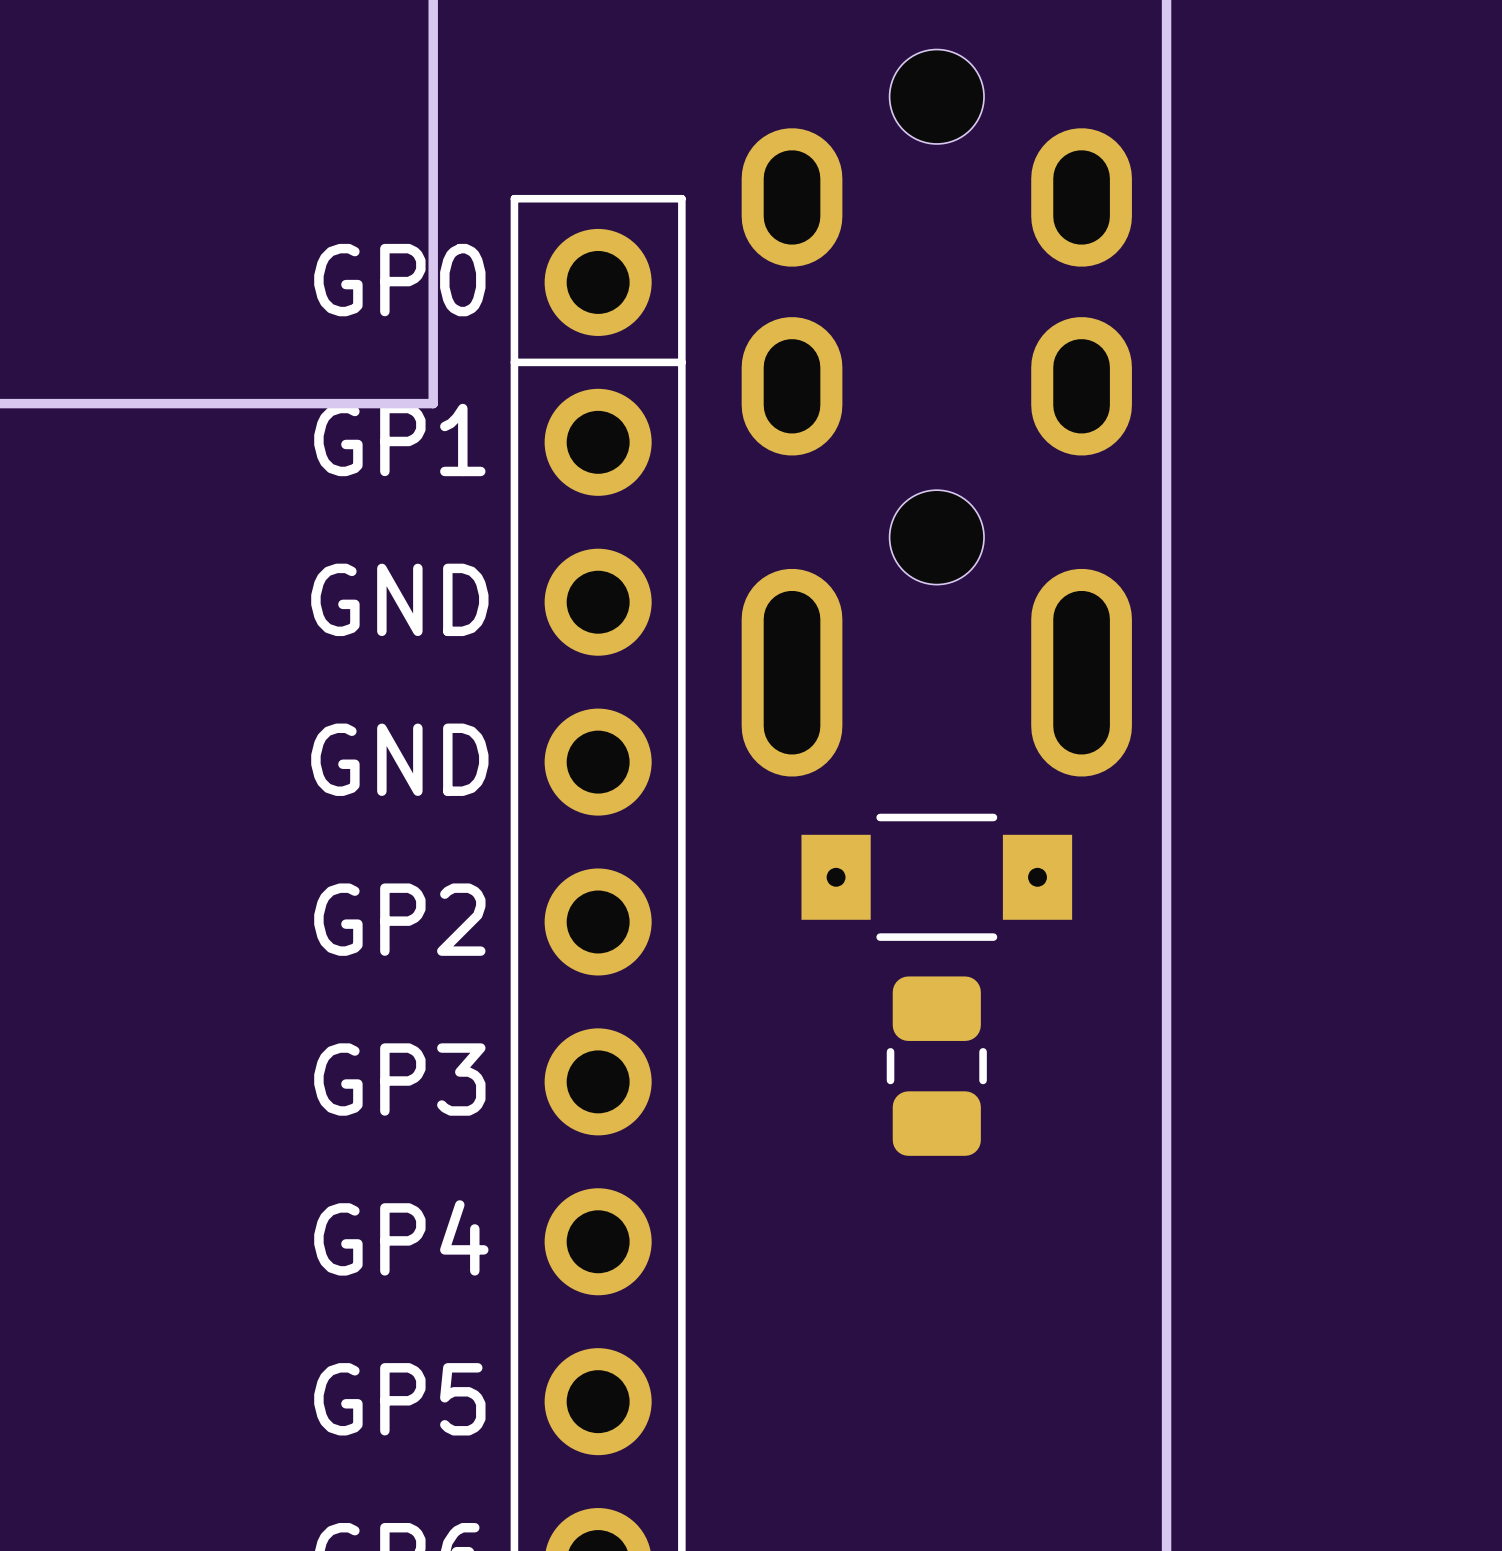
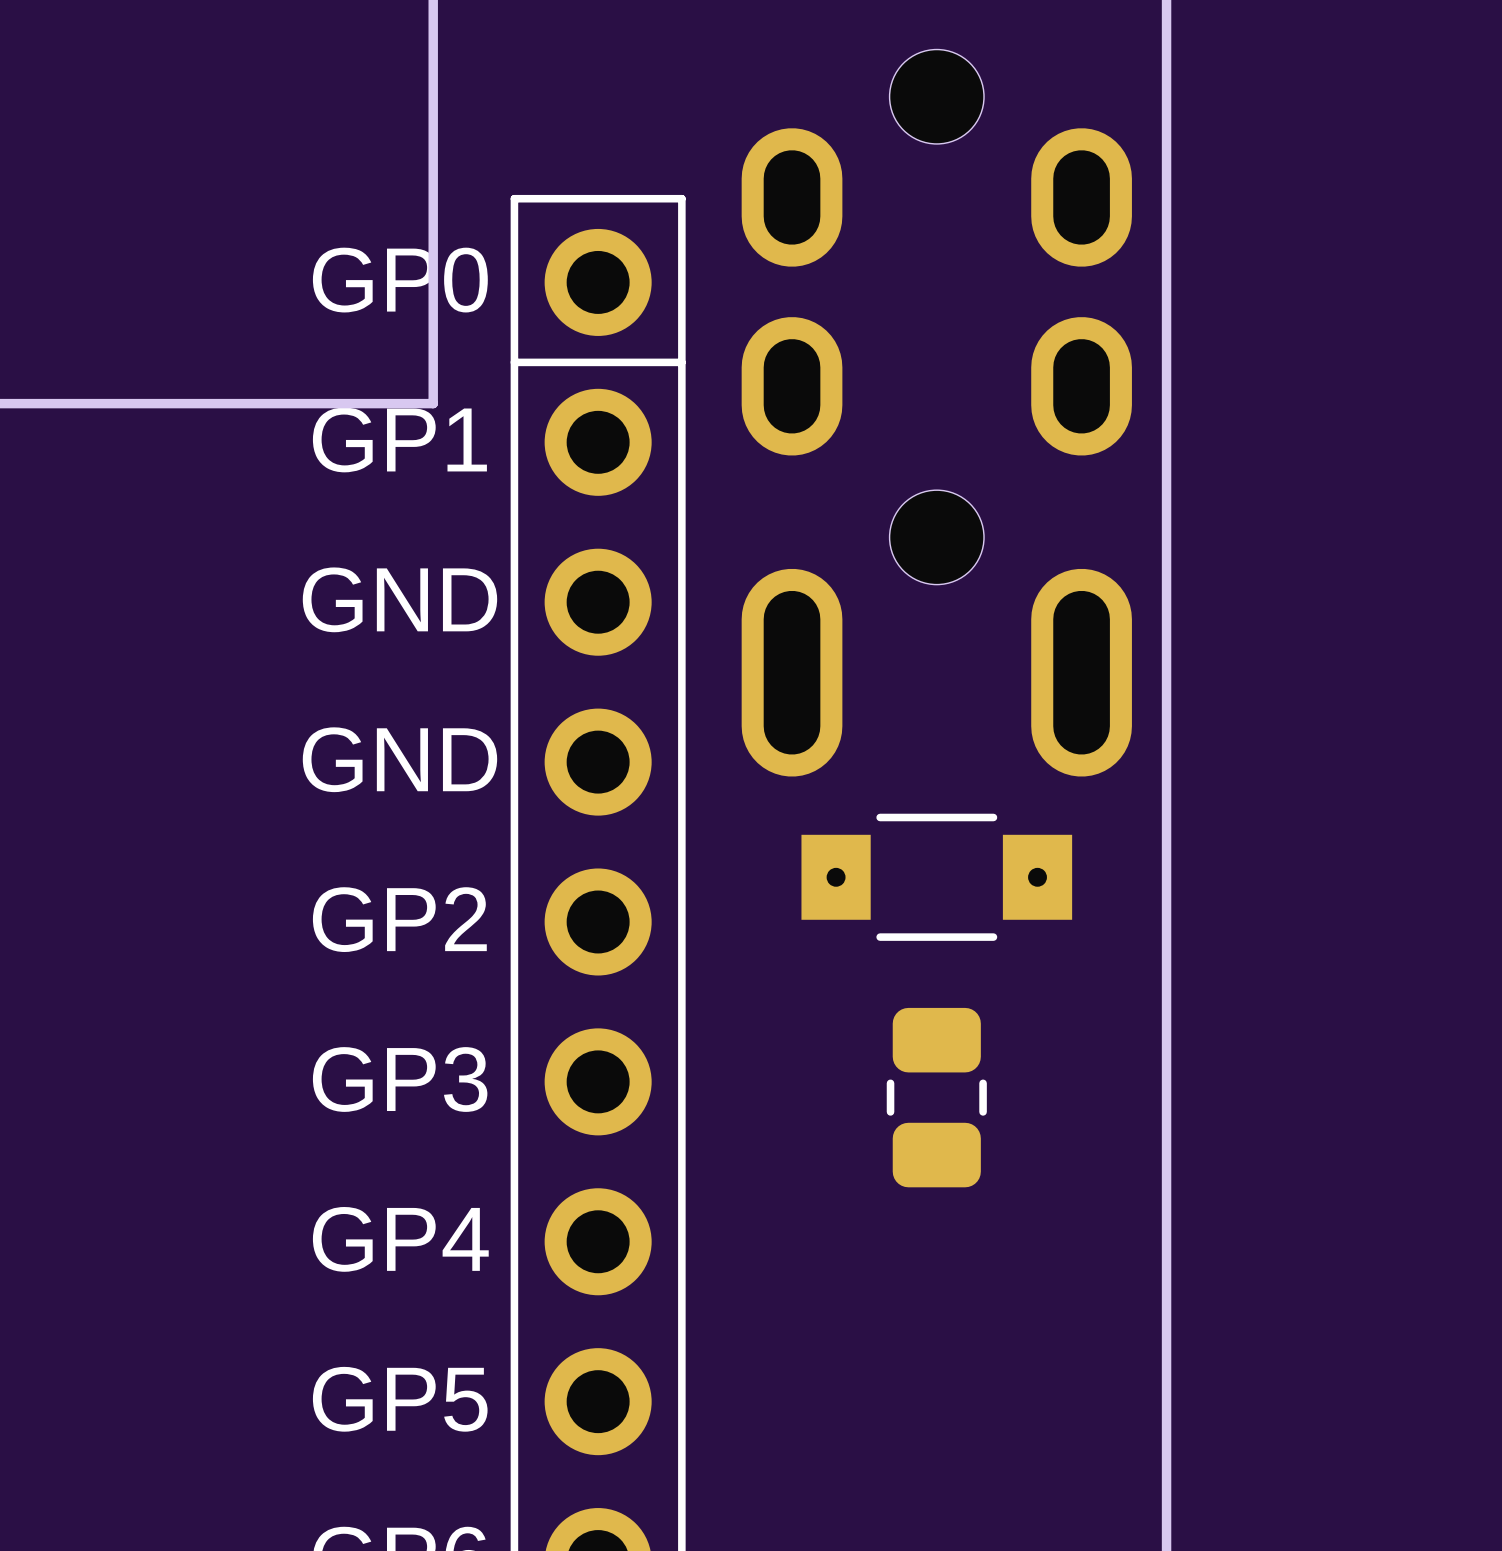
part position: (936, 1066) -> (936, 1097)

